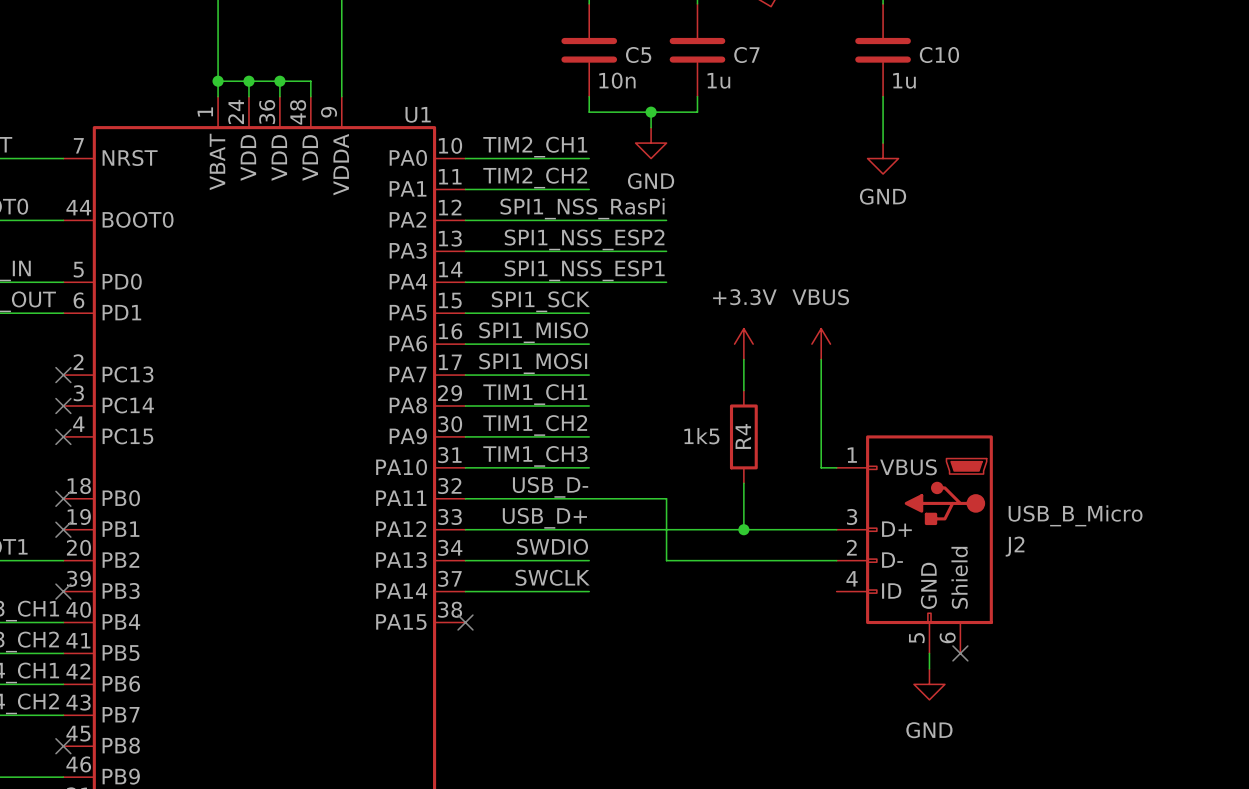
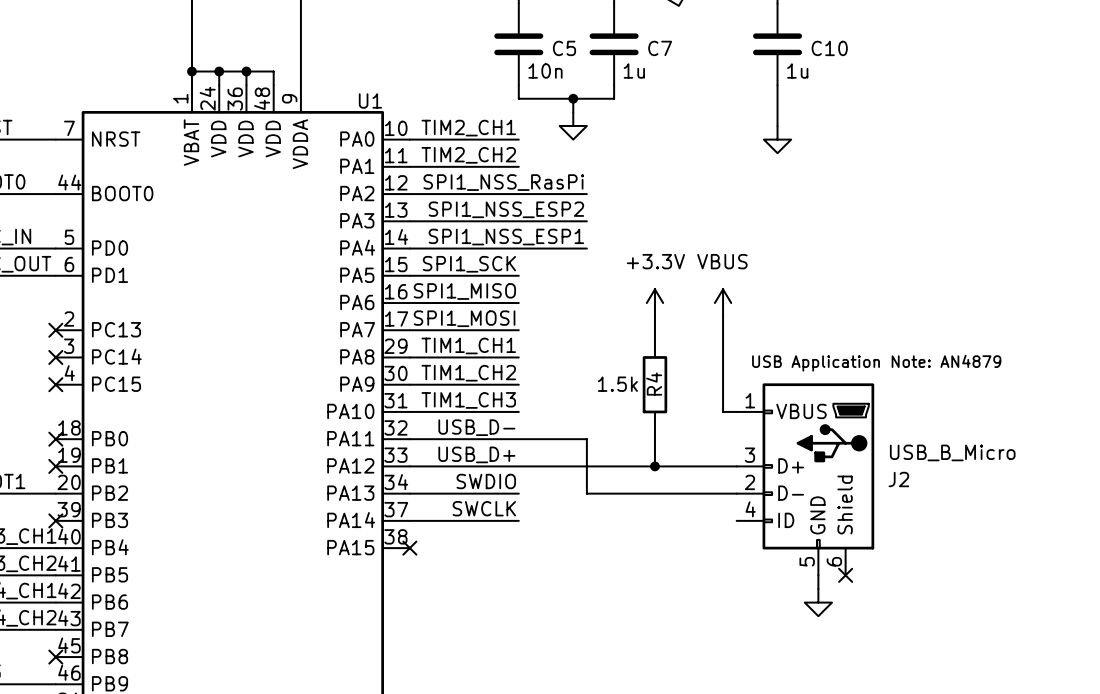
power symbol text: GND (651, 181) -> none
power symbol text: GND (883, 196) -> none
text: none -> USB Application Note: AN4879 (876, 363)
R4 value: 1k5 (701, 436) -> 1.5k (617, 384)
power symbol text: GND (929, 730) -> none

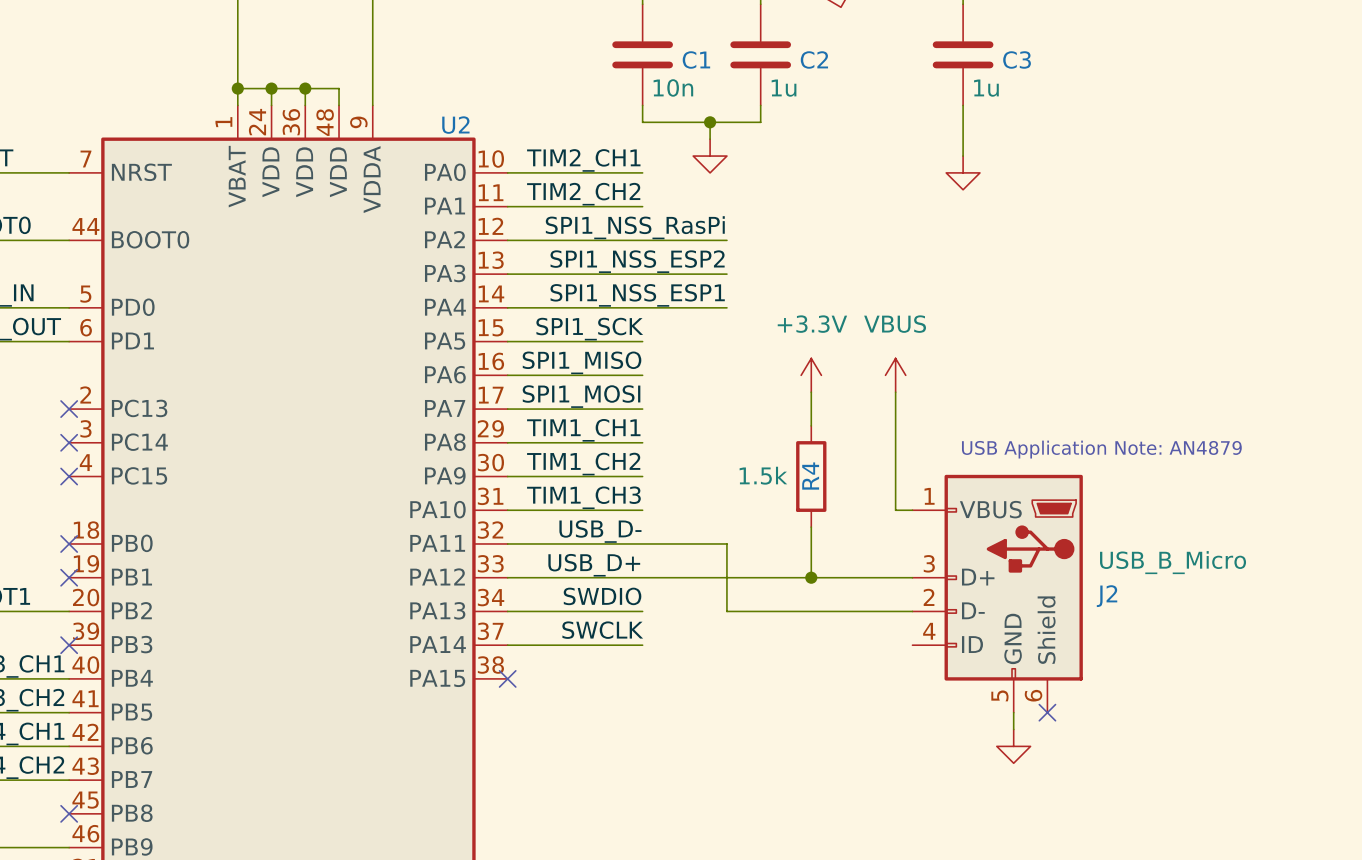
C5 name: C5 (564, 48) -> C1 (696, 59)
C7 name: C7 (660, 48) -> C2 (814, 59)
C10 name: C10 (829, 48) -> C3 (1017, 59)
U1 name: U1 (370, 100) -> U2 (455, 125)

